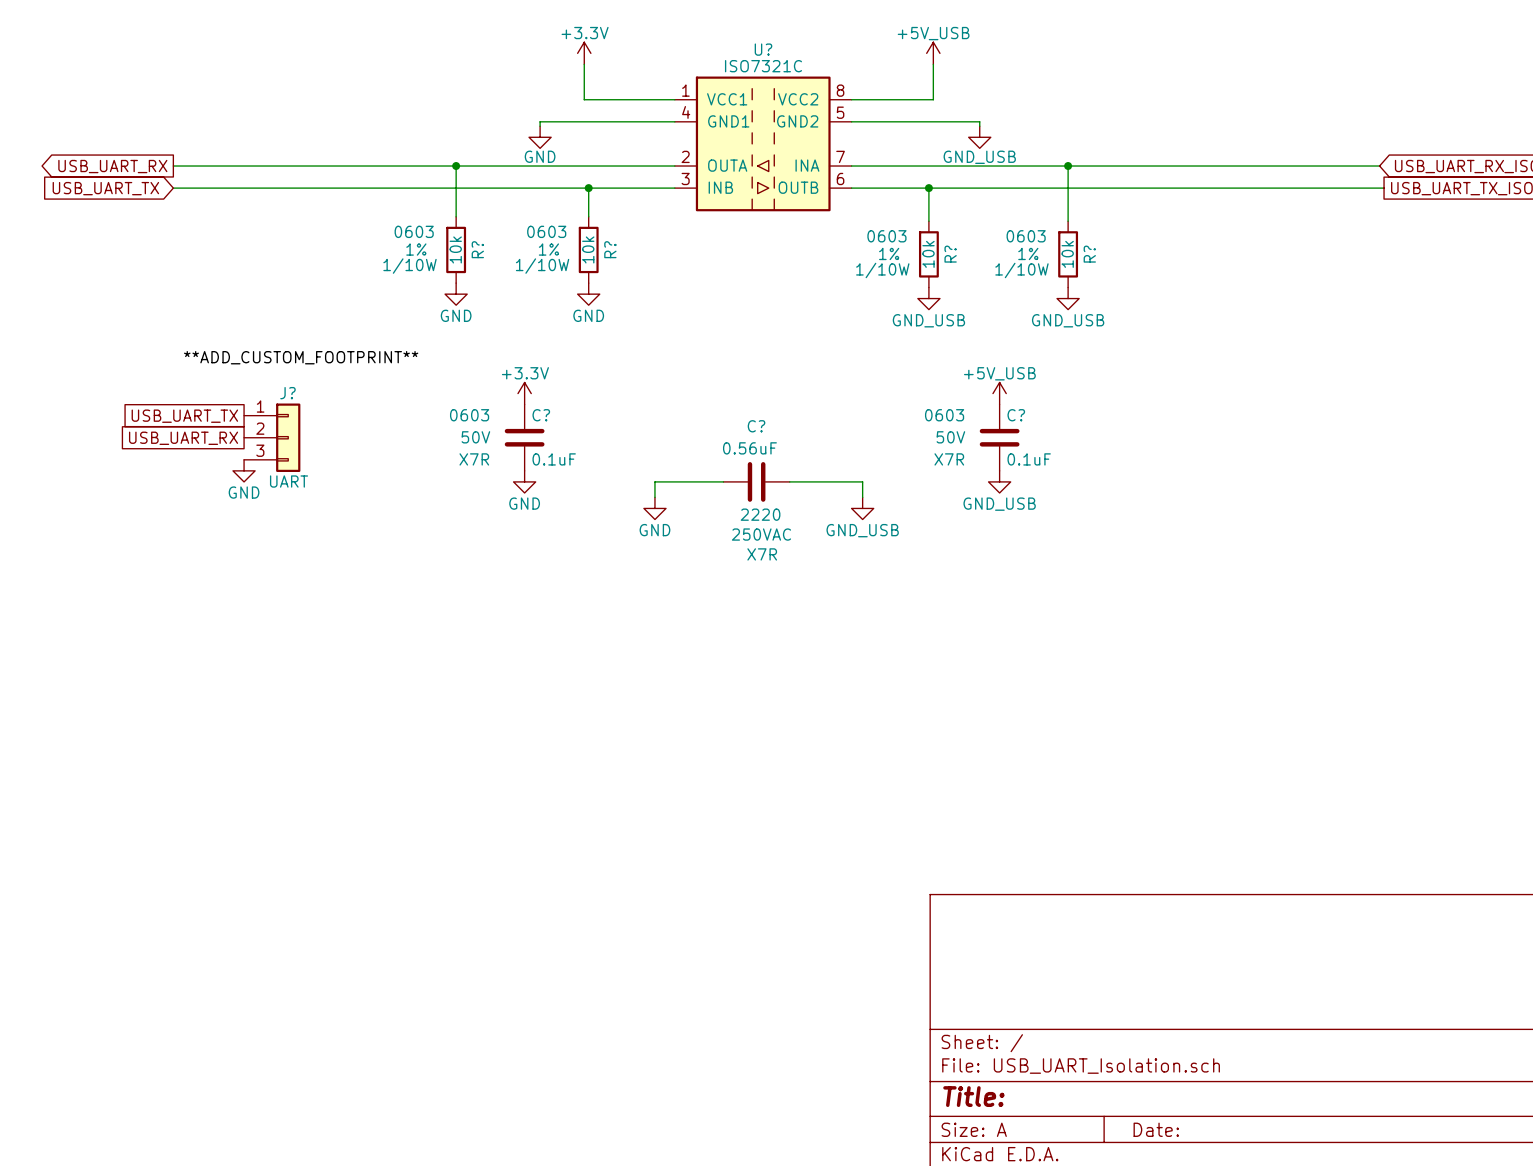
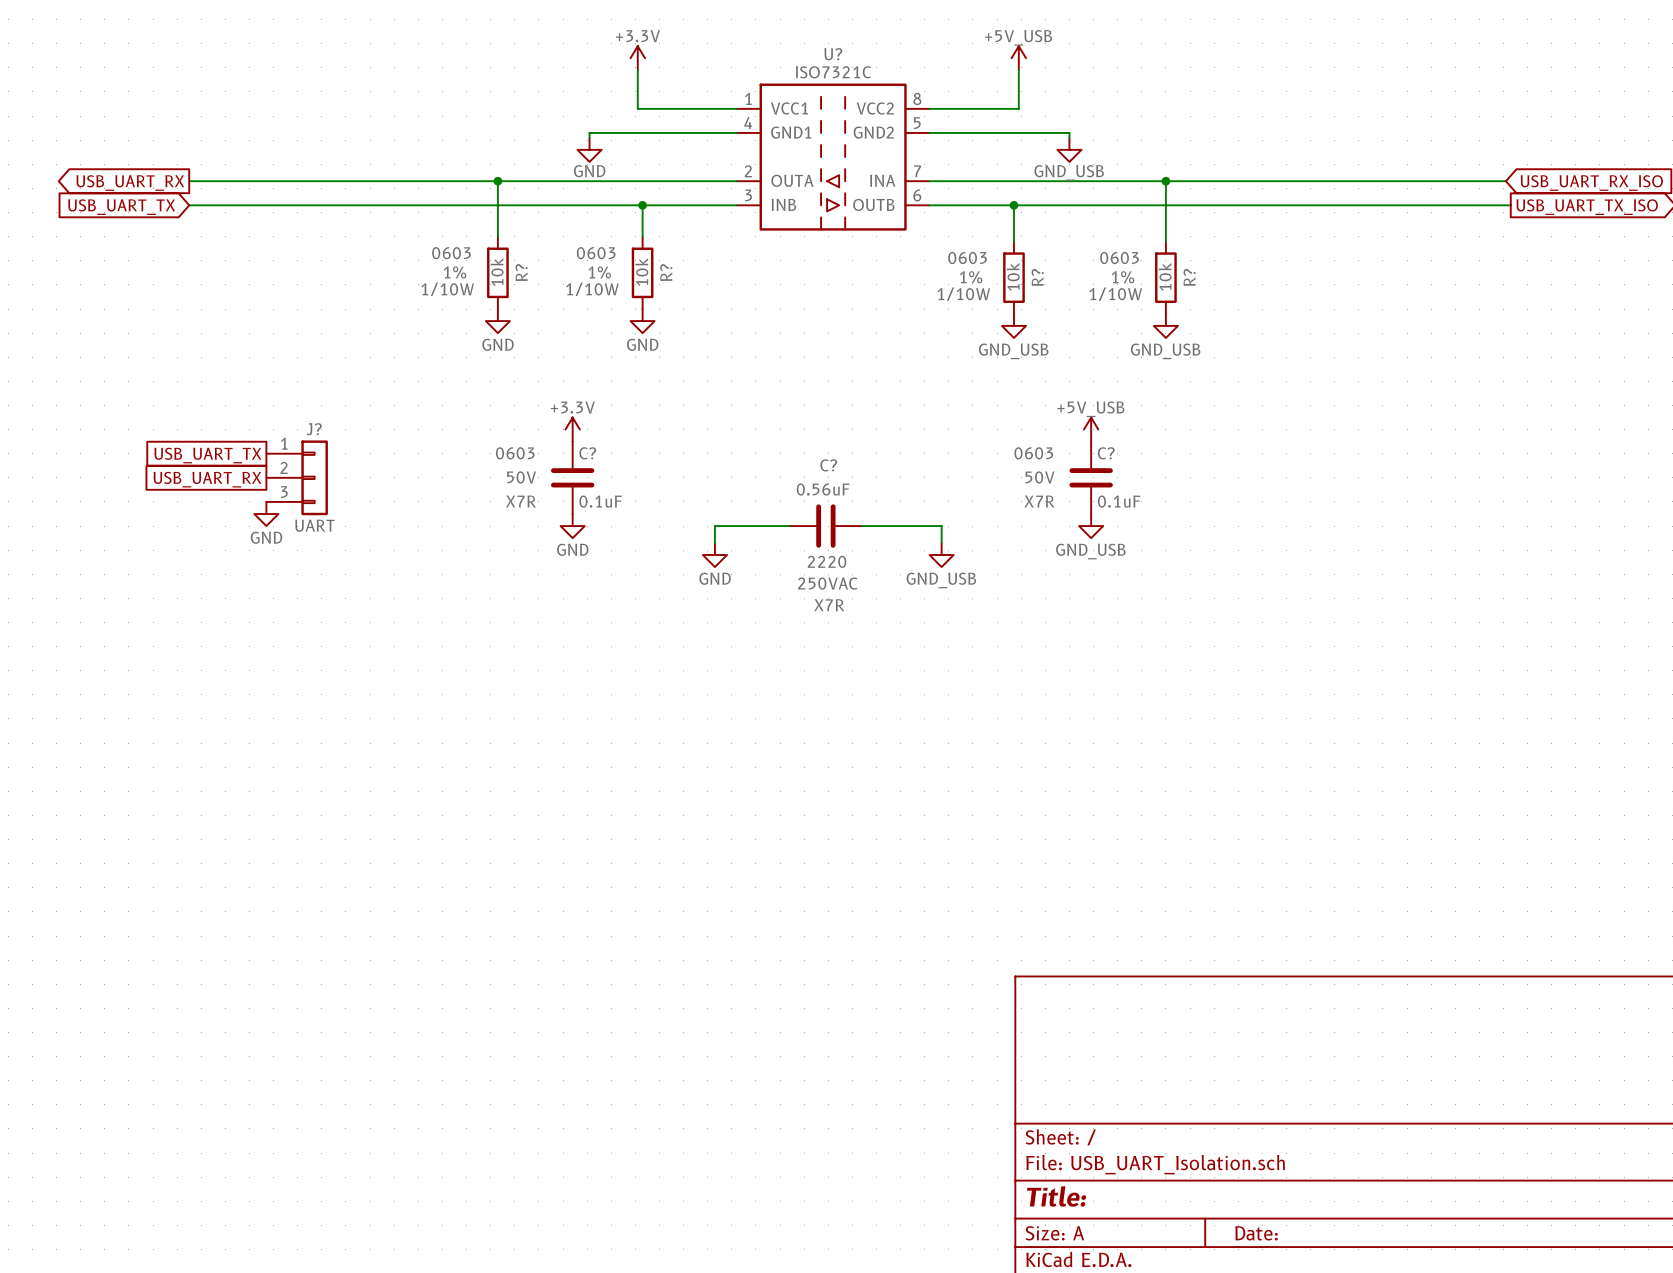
label: **ADD_CUSTOM_FOOTPRINT** (301, 357) -> none

